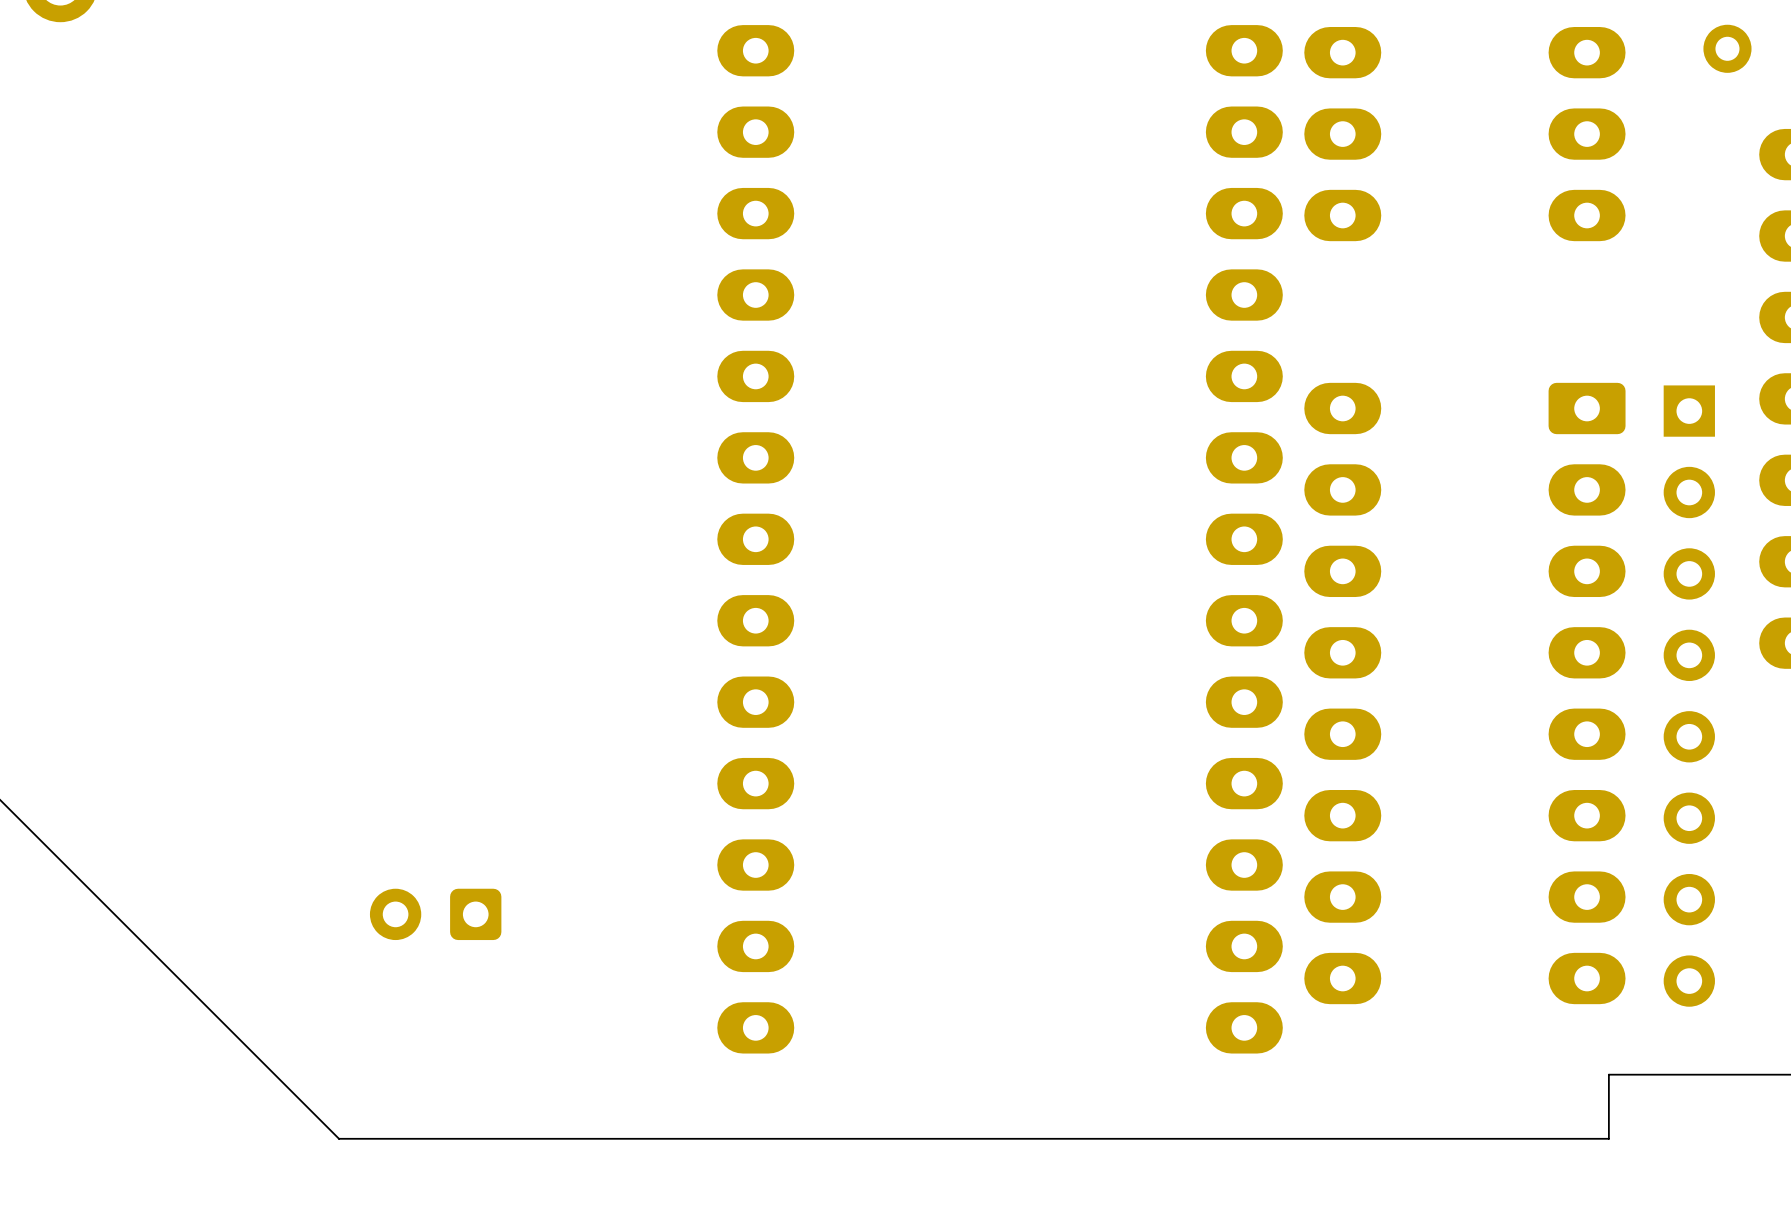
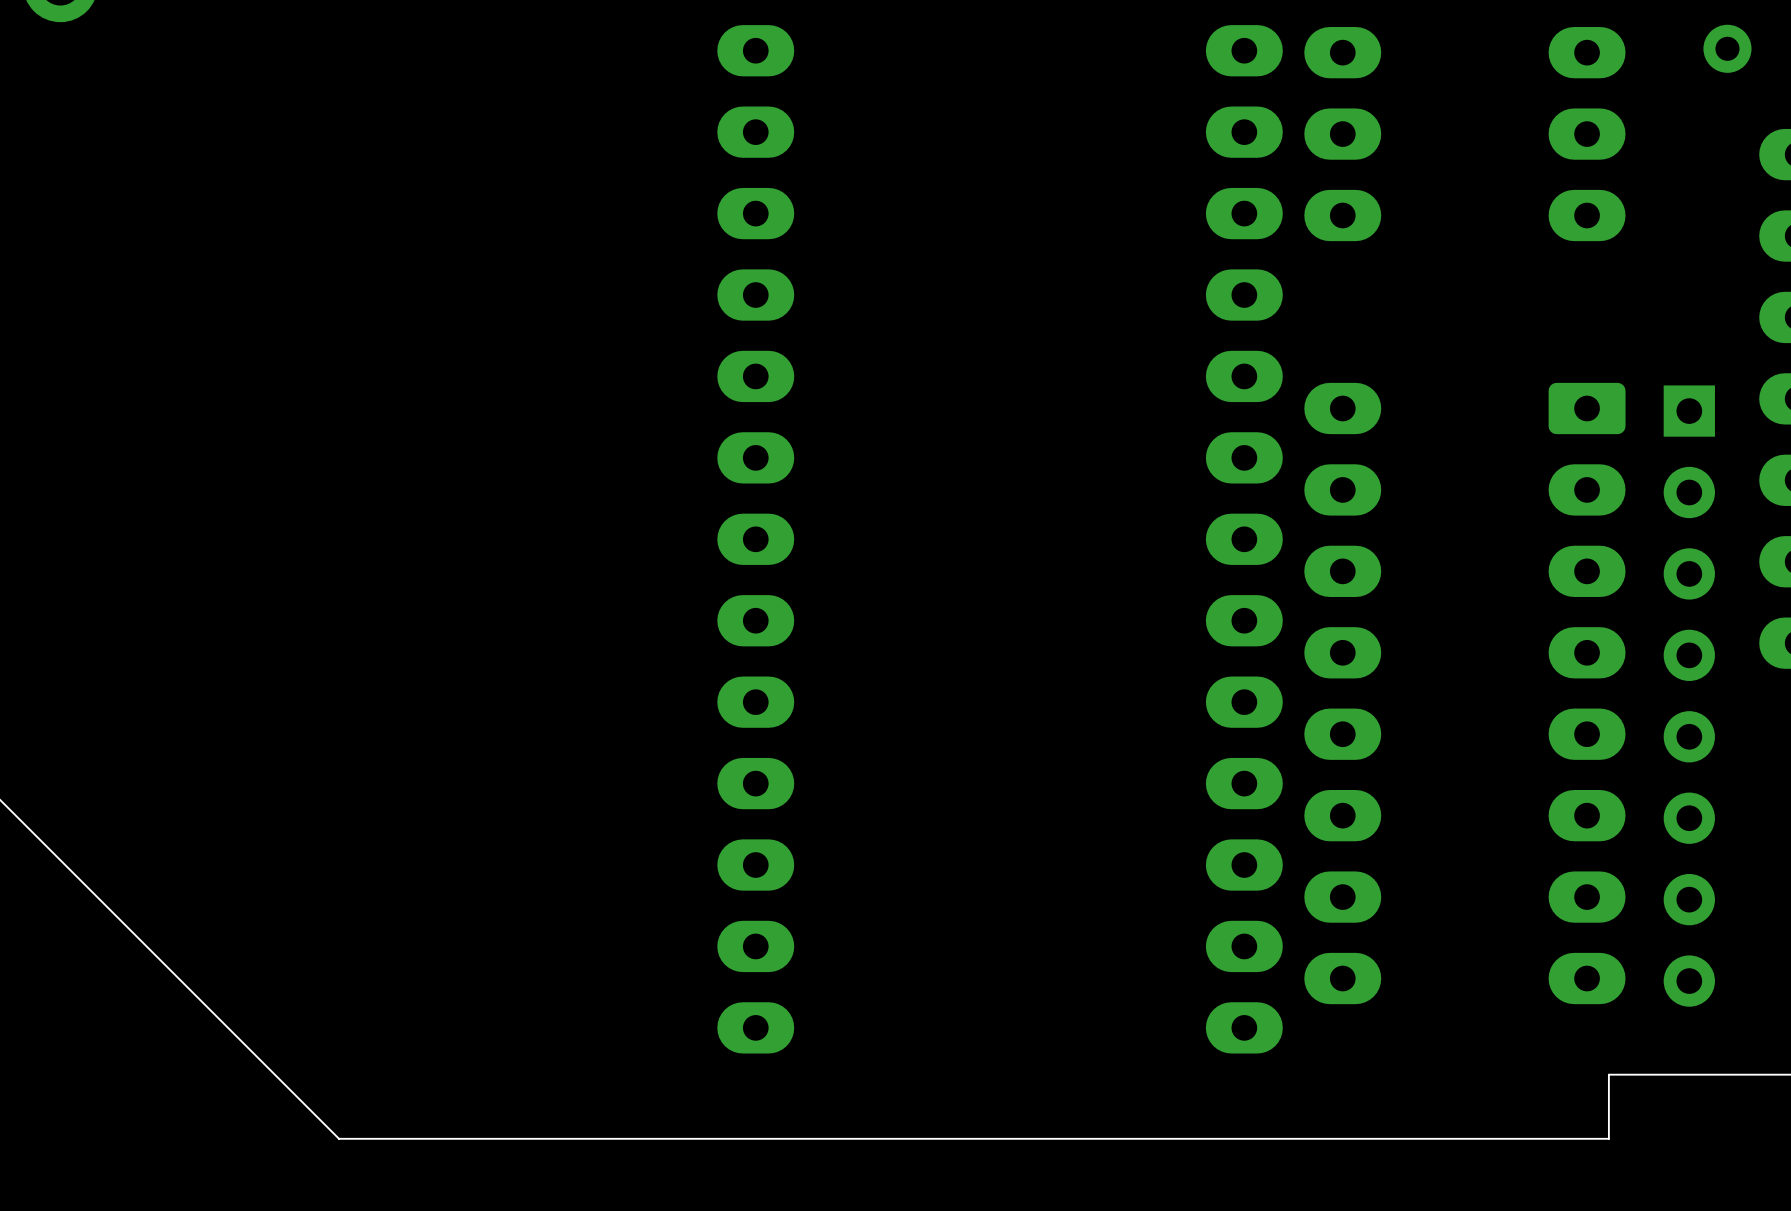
part: (435, 914) -> none

